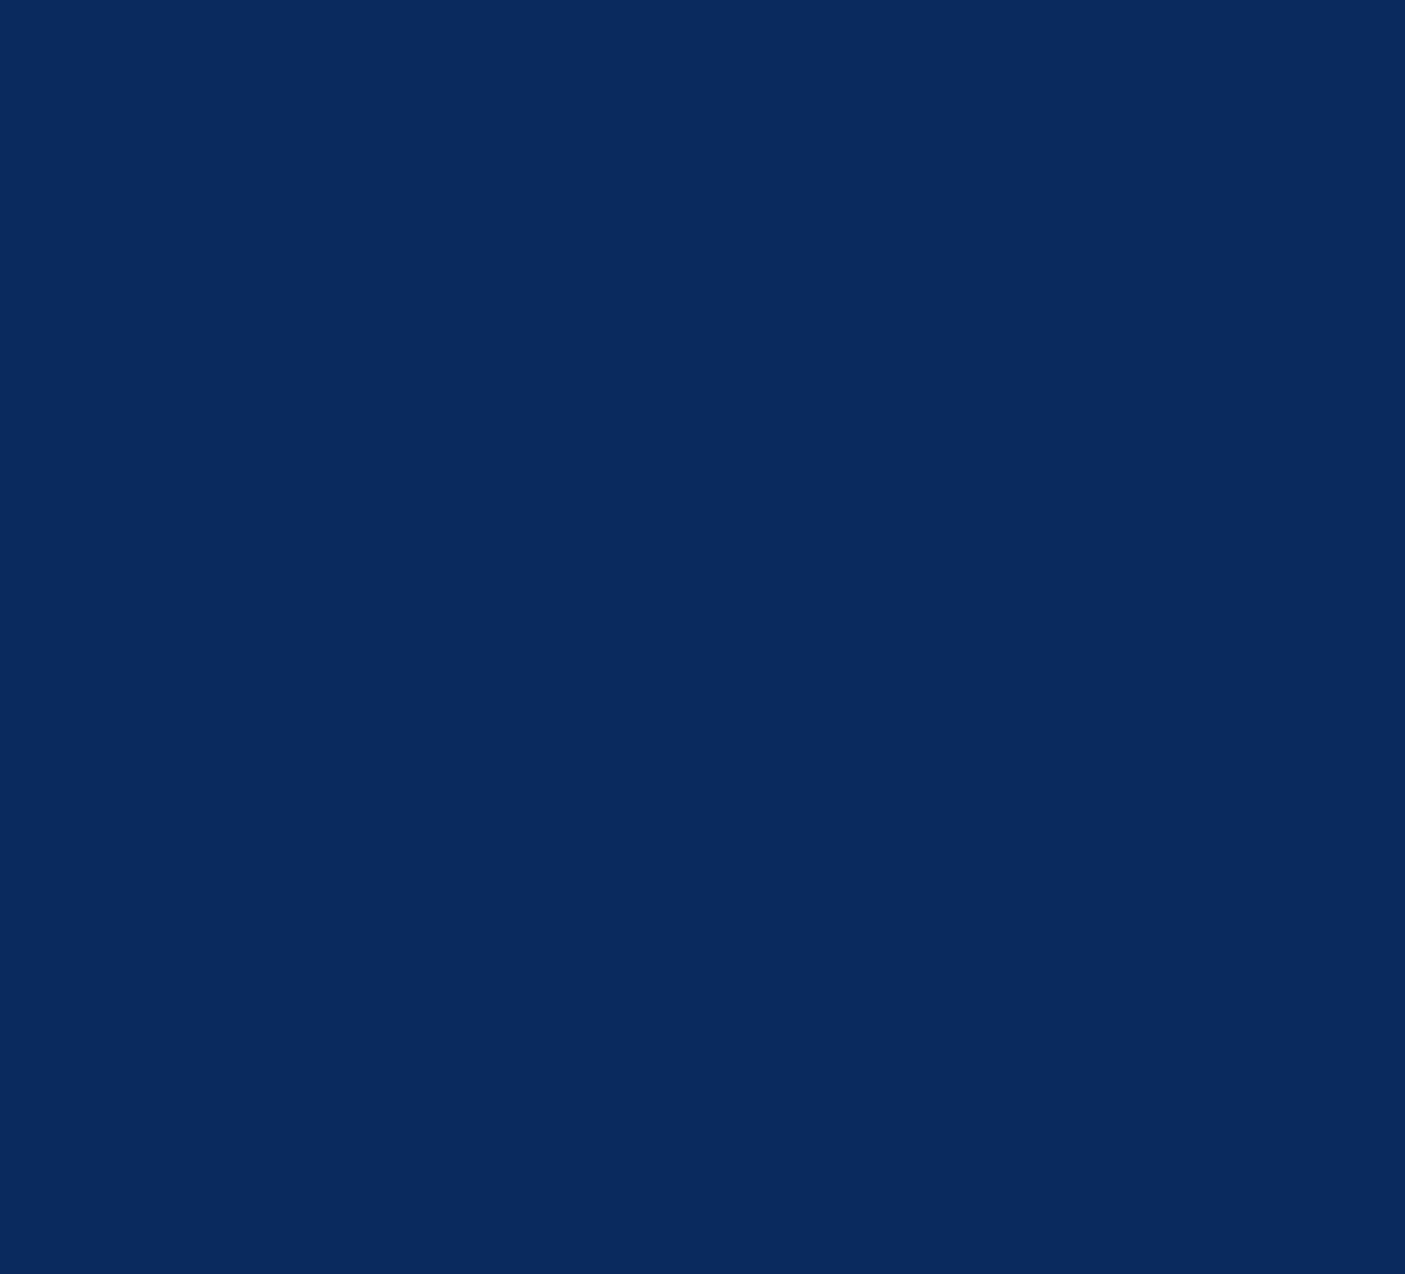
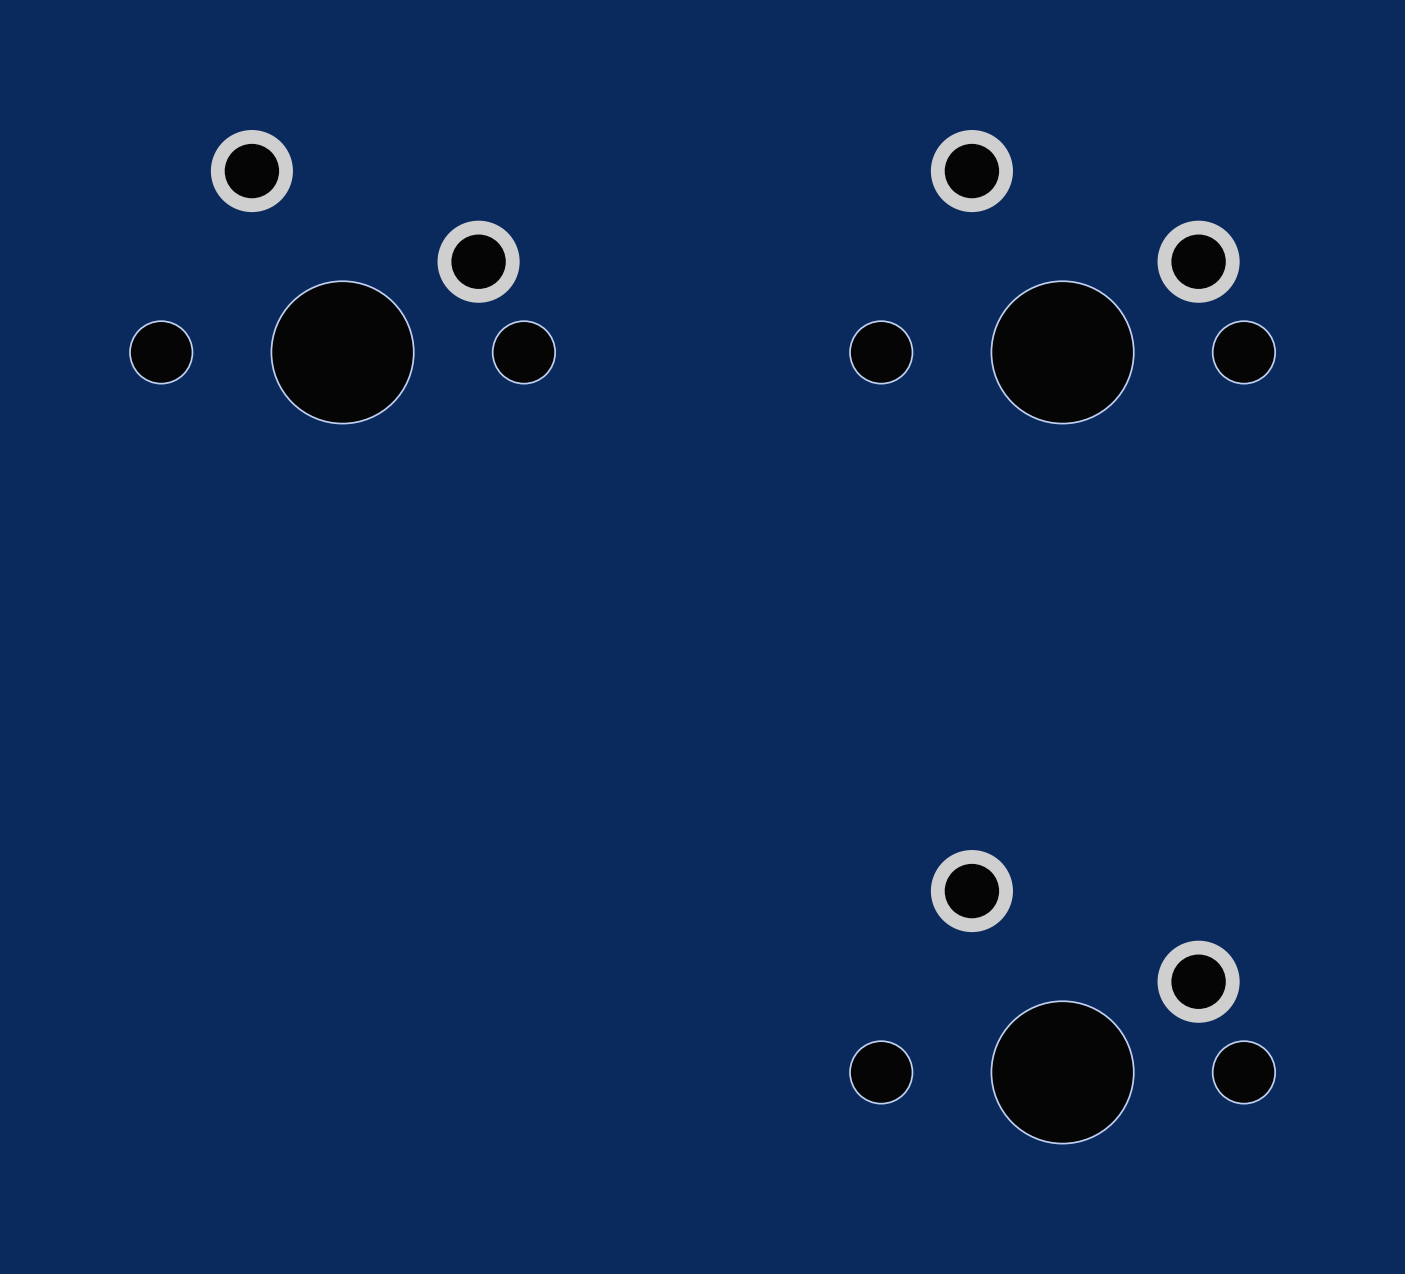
part: none -> (342, 276)
part: none -> (1062, 276)
part: none -> (1062, 996)

